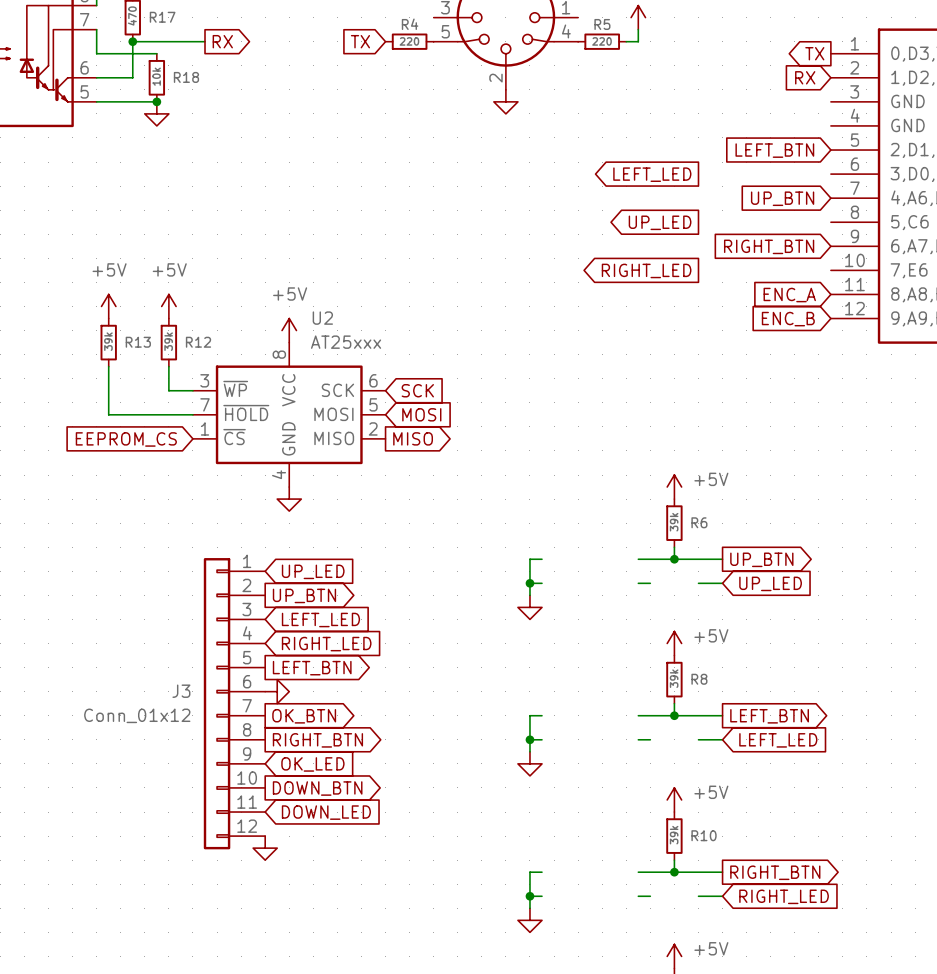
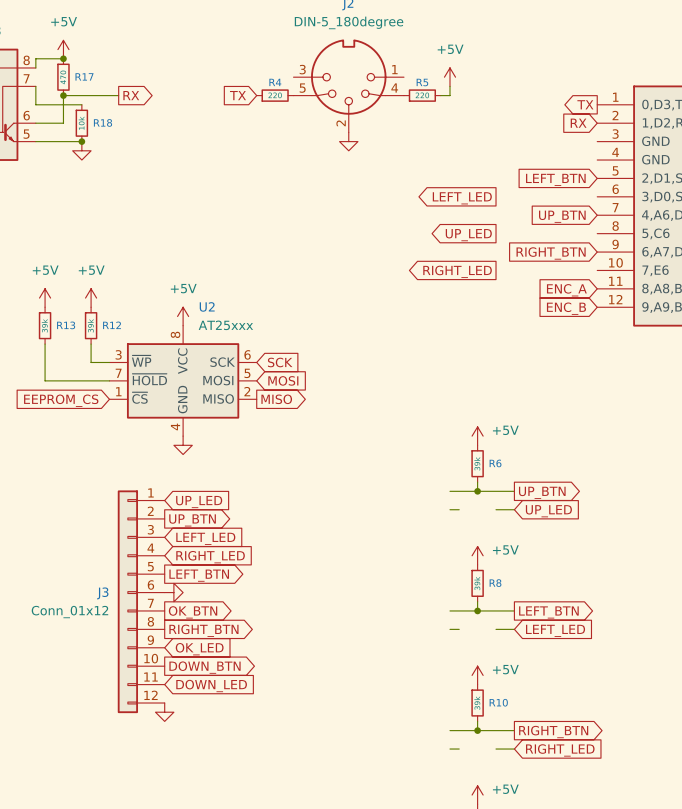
wire: (542, 559) (529, 559) (529, 595) -> none
wire: (529, 583) (542, 583) -> none
junction: (529, 583) -> none
power symbol: (529, 607) -> none
wire: (542, 715) (529, 715) (529, 751) -> none
wire: (529, 739) (542, 739) -> none
junction: (529, 739) -> none
power symbol: (529, 763) -> none
wire: (542, 872) (529, 872) (529, 908) -> none
wire: (529, 896) (542, 896) -> none
junction: (529, 896) -> none
power symbol: (529, 920) -> none

